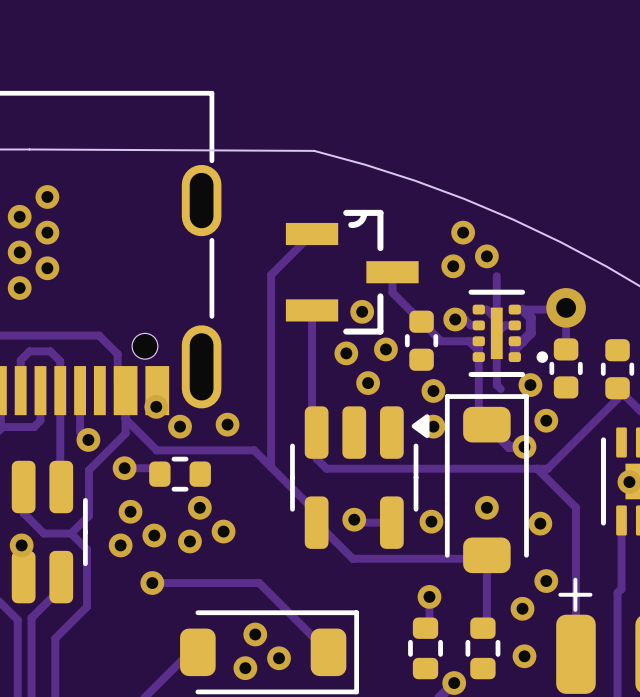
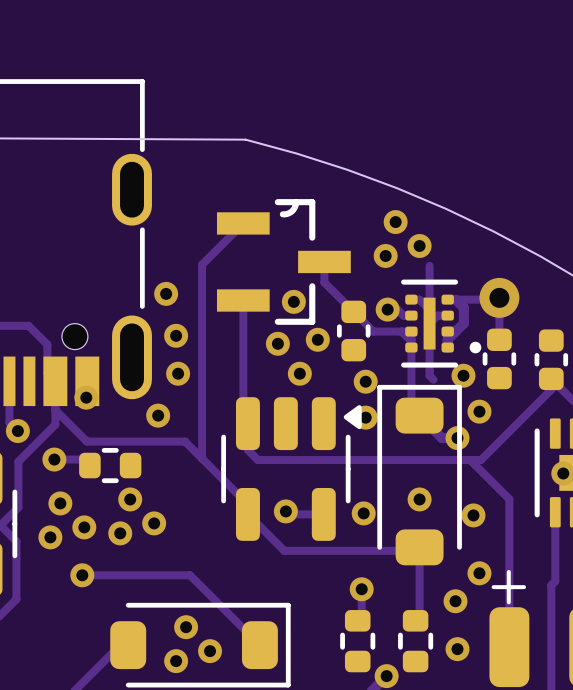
via: none -> (166, 293)
via: none -> (176, 335)
via: none -> (178, 373)
via: (180, 426) -> none

